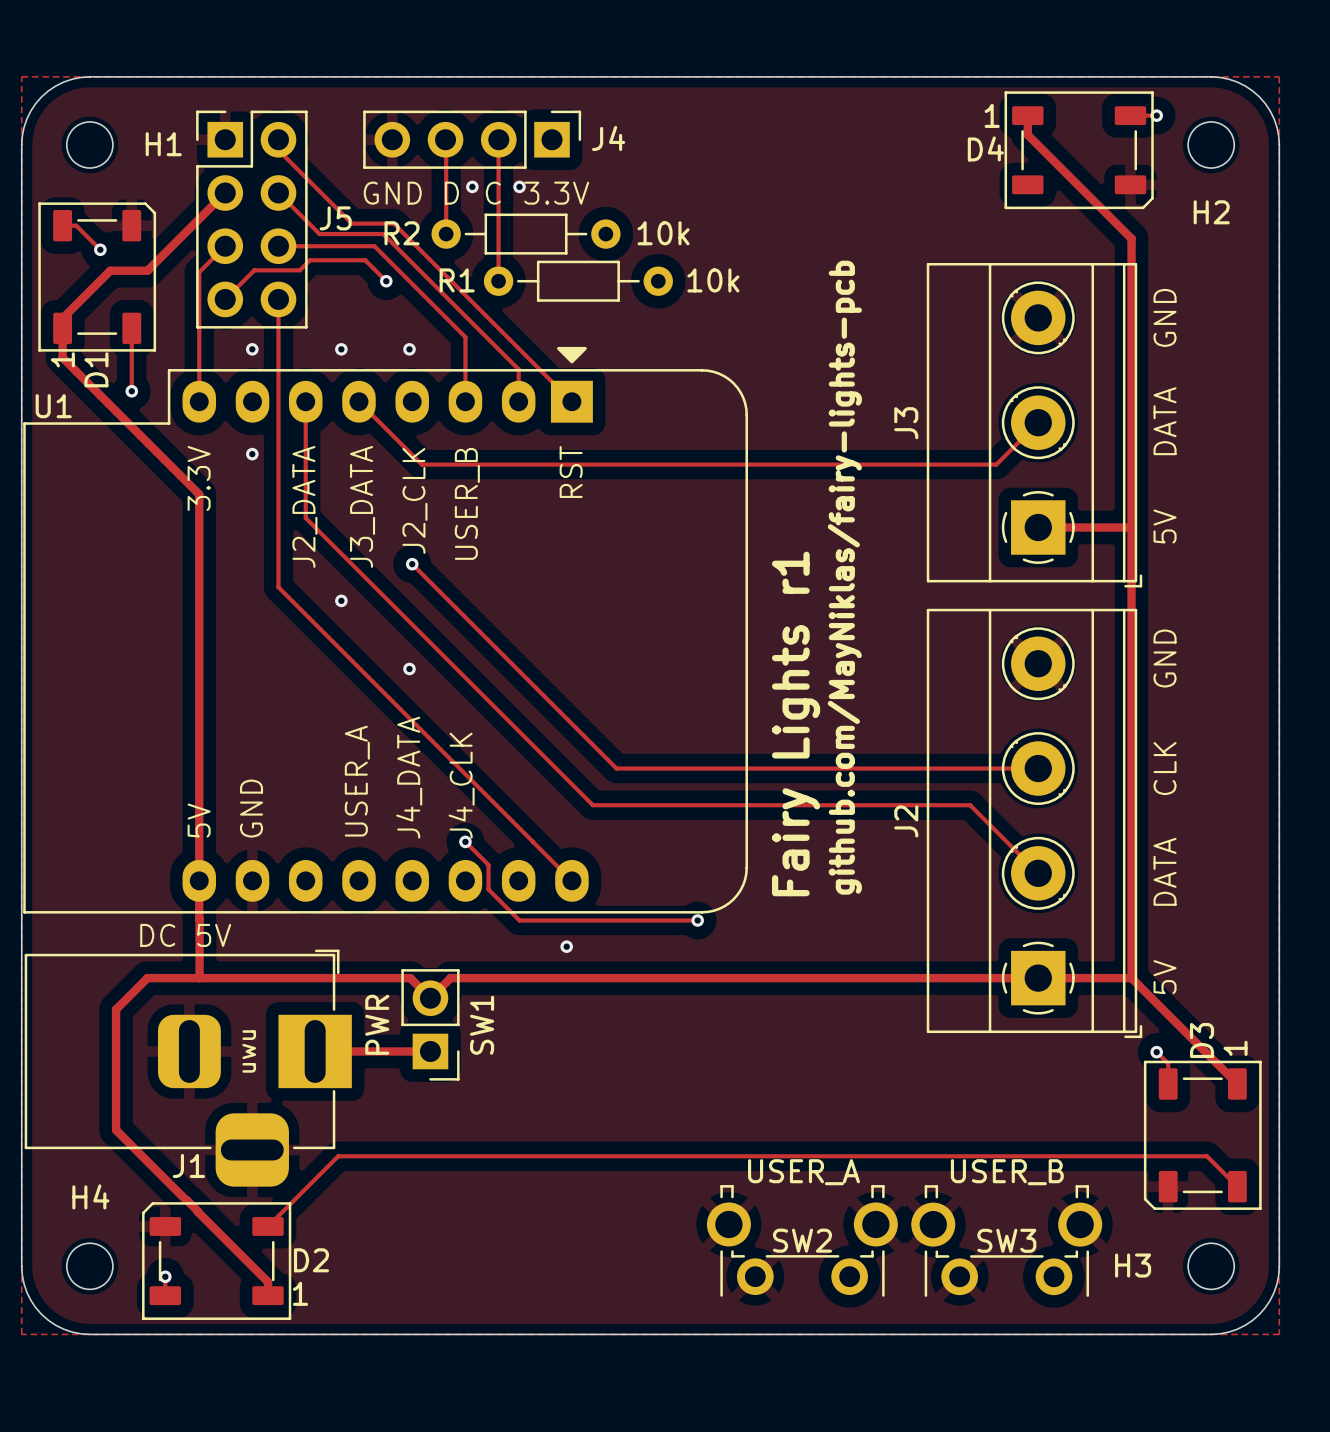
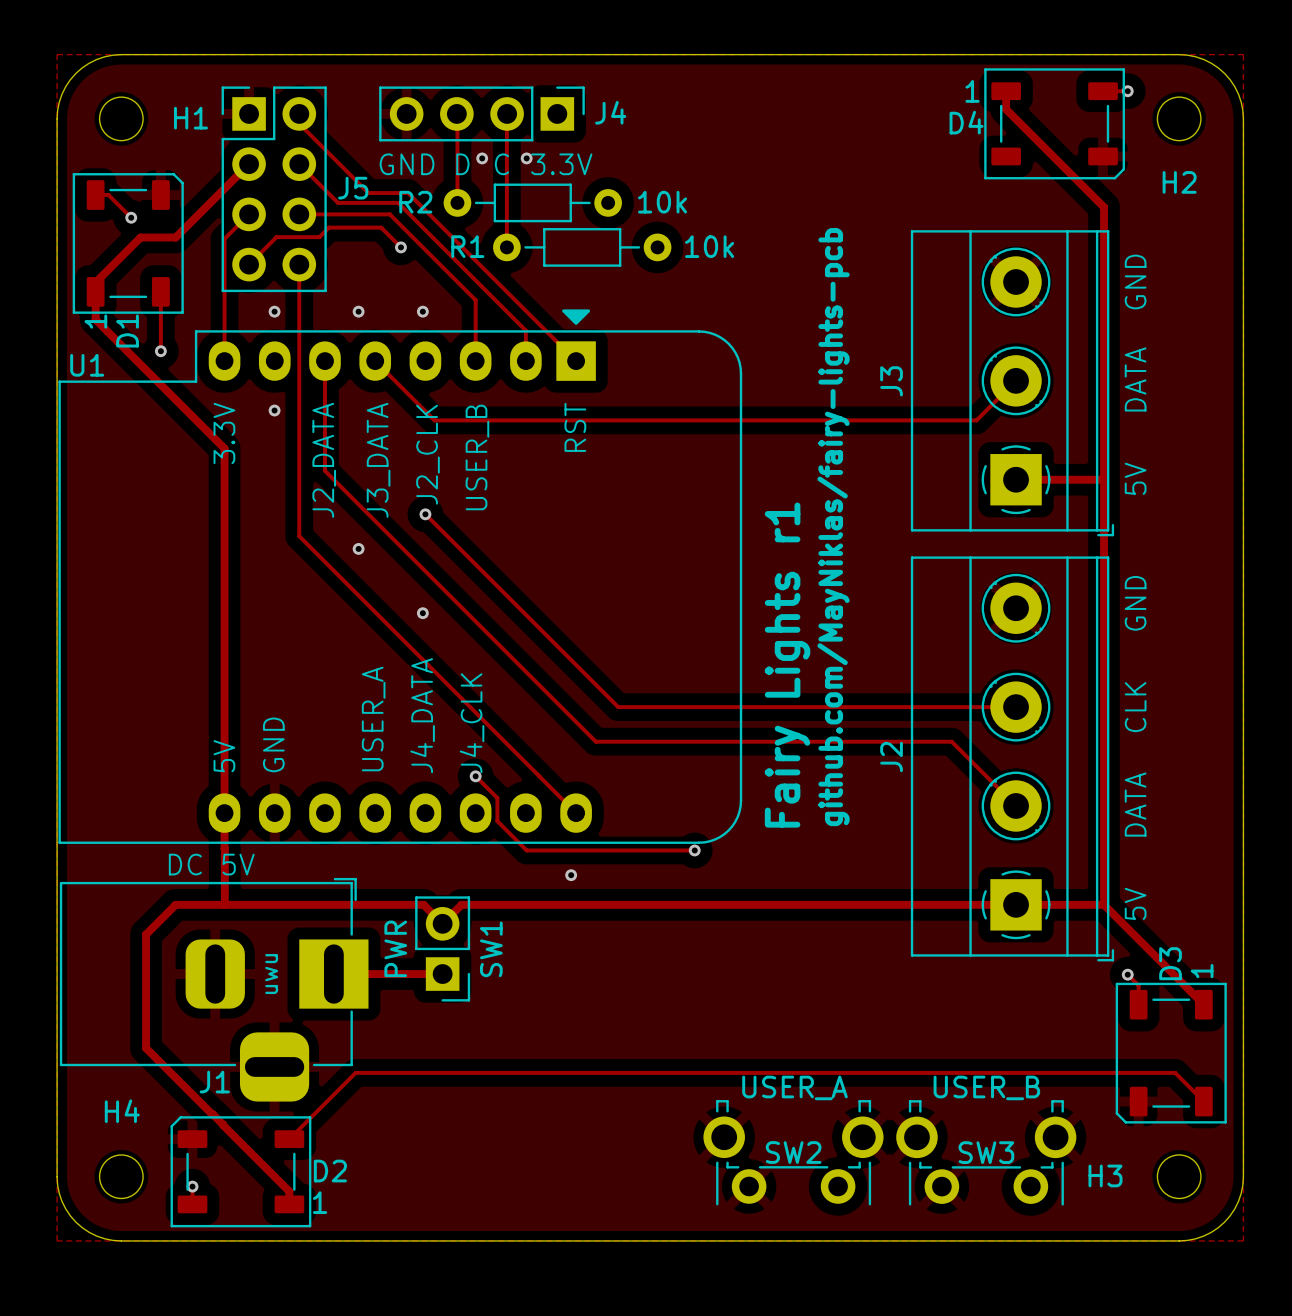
SW1 value: PWR (377, 1024) -> none
text: none -> PWR (395, 948)

